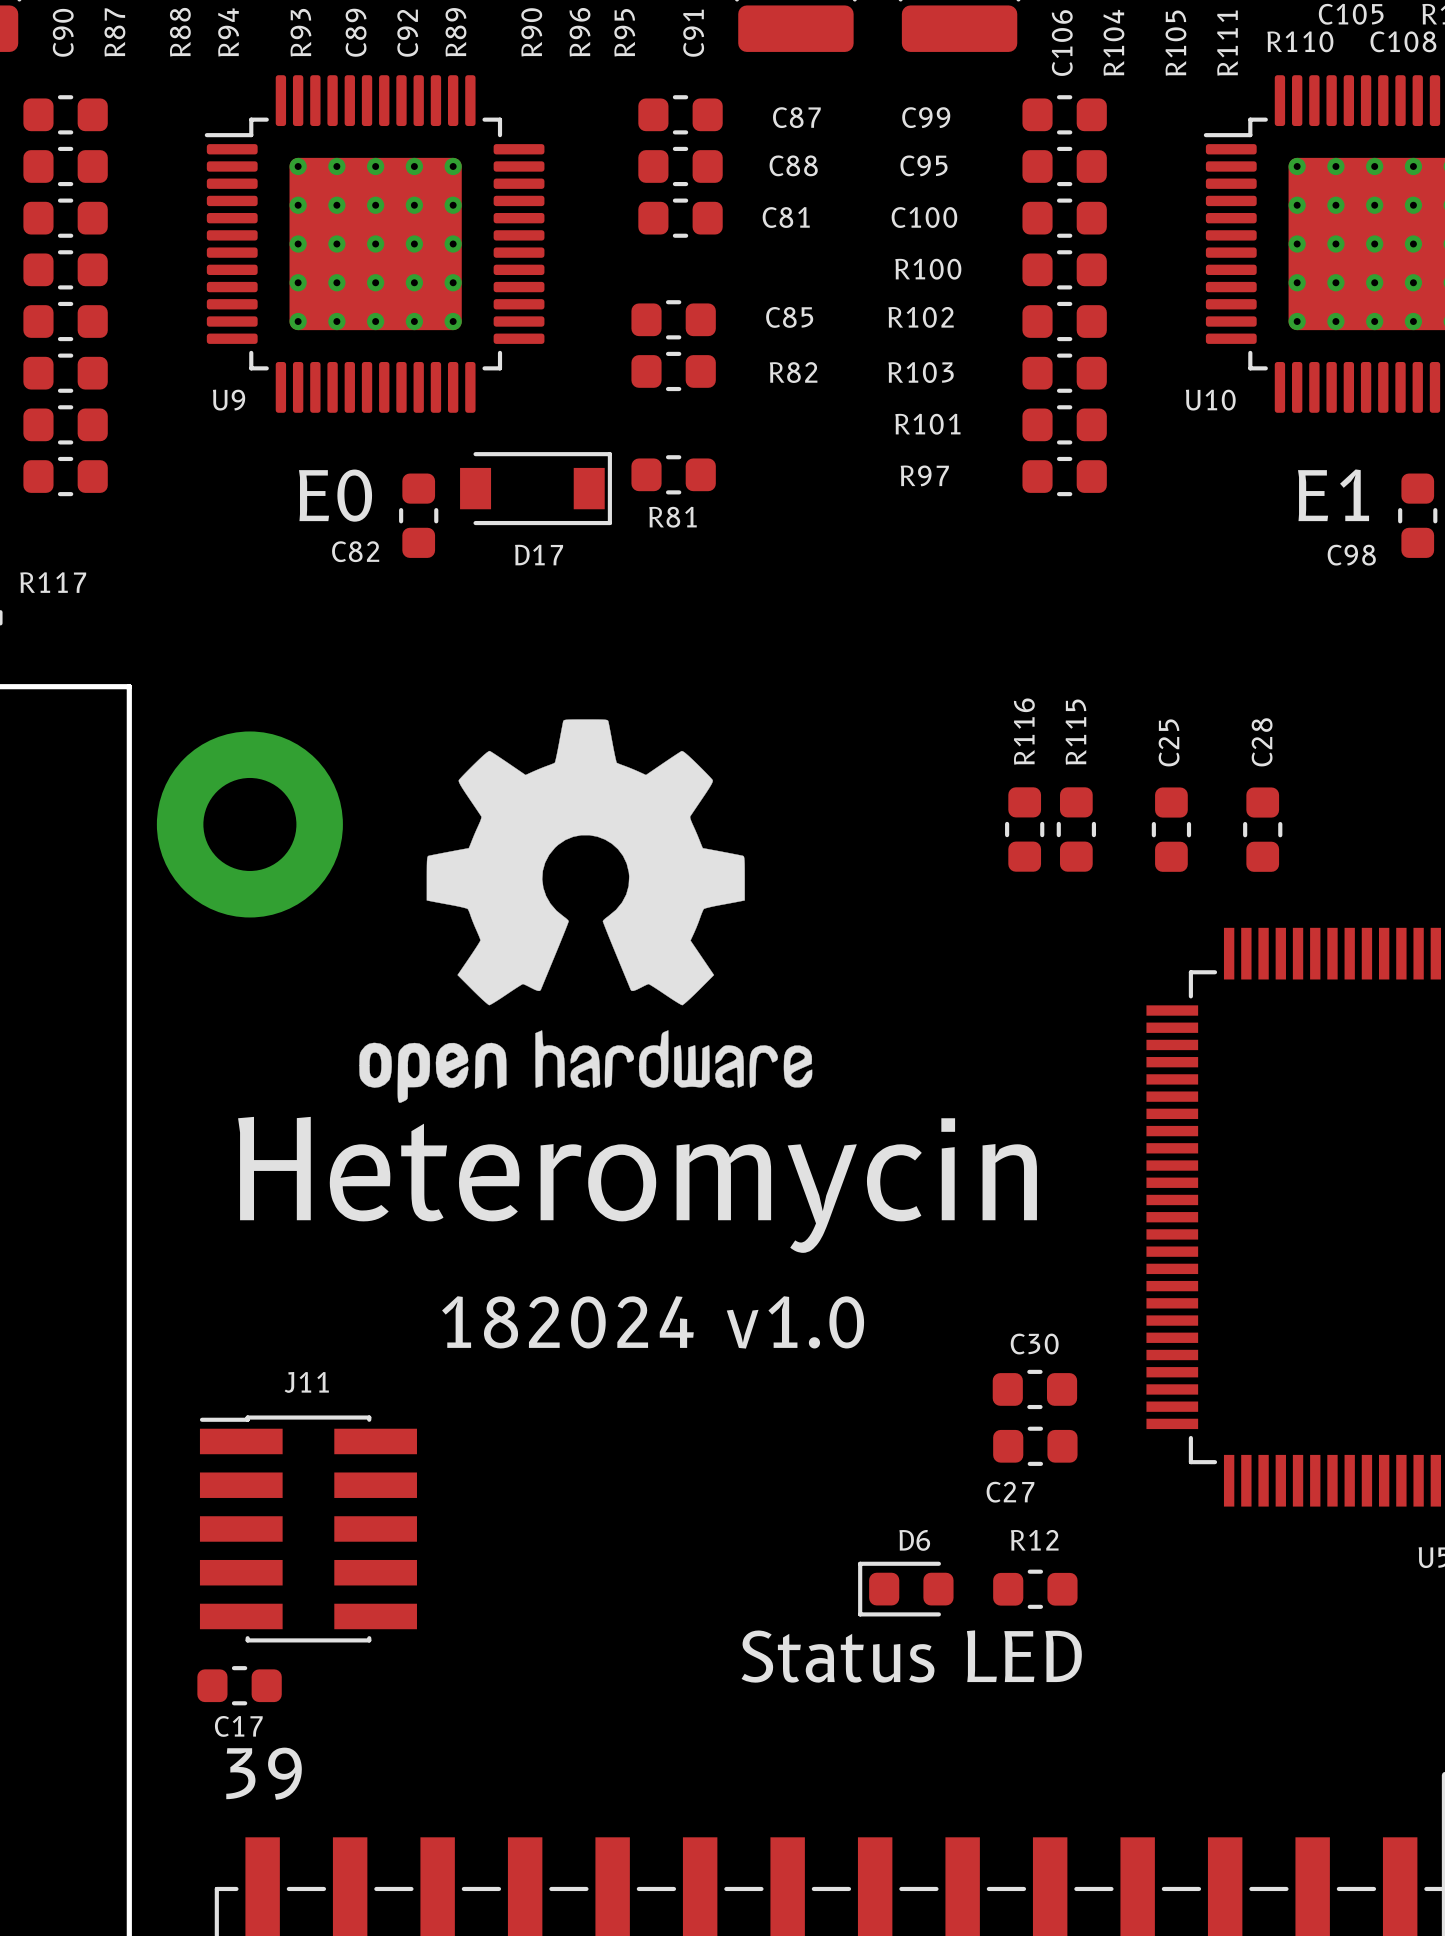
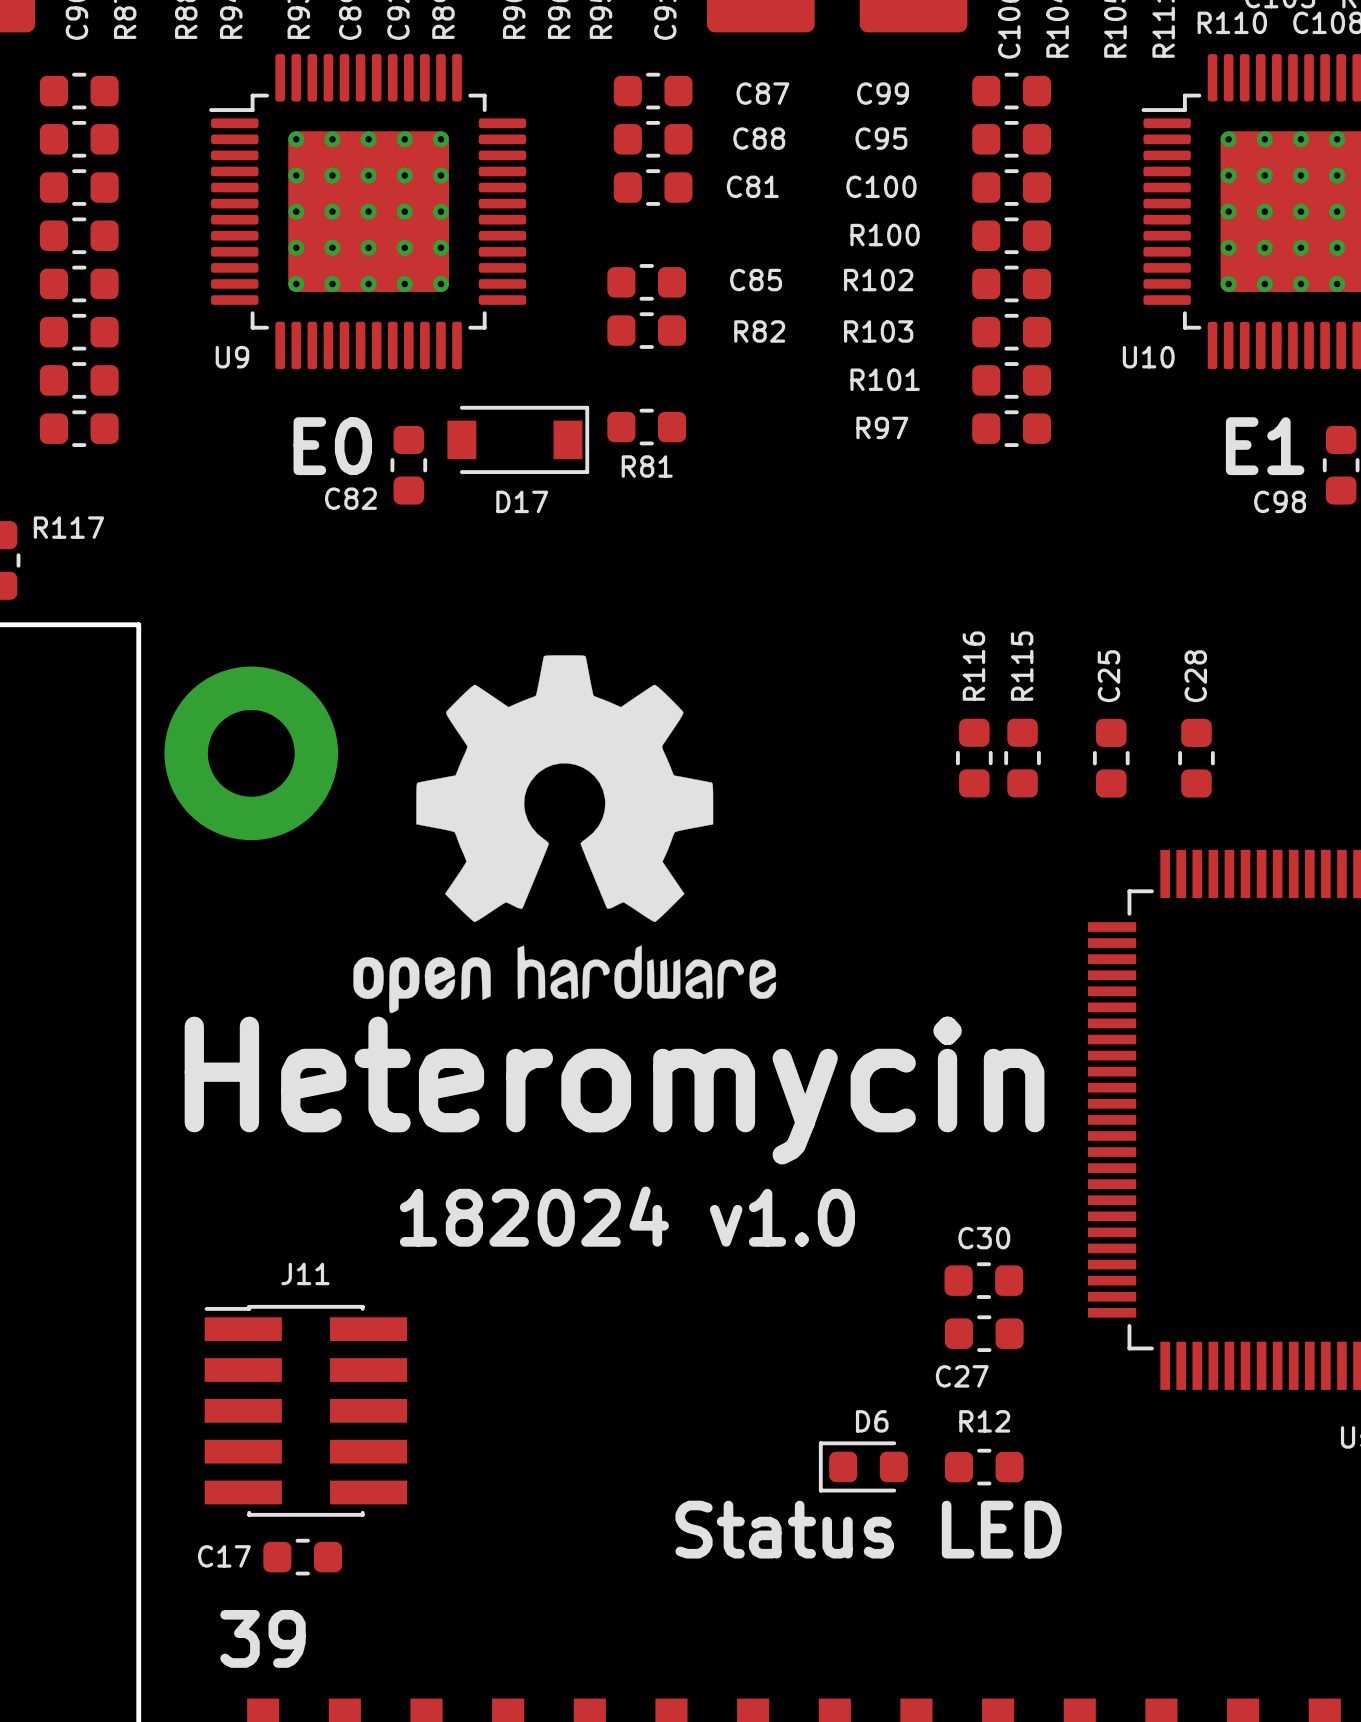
C17 position: (239, 1685) -> (302, 1557)
C17 name position: C17 (238, 1726) -> C17 (224, 1556)

